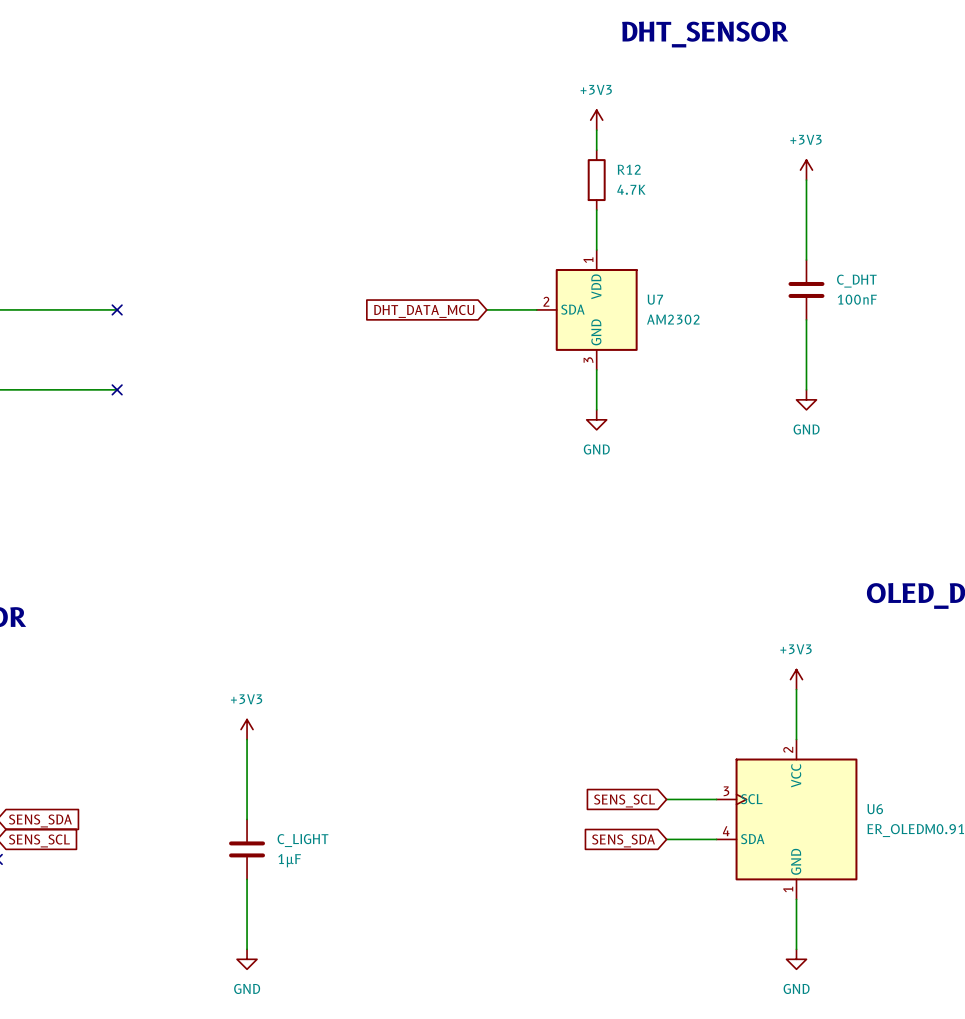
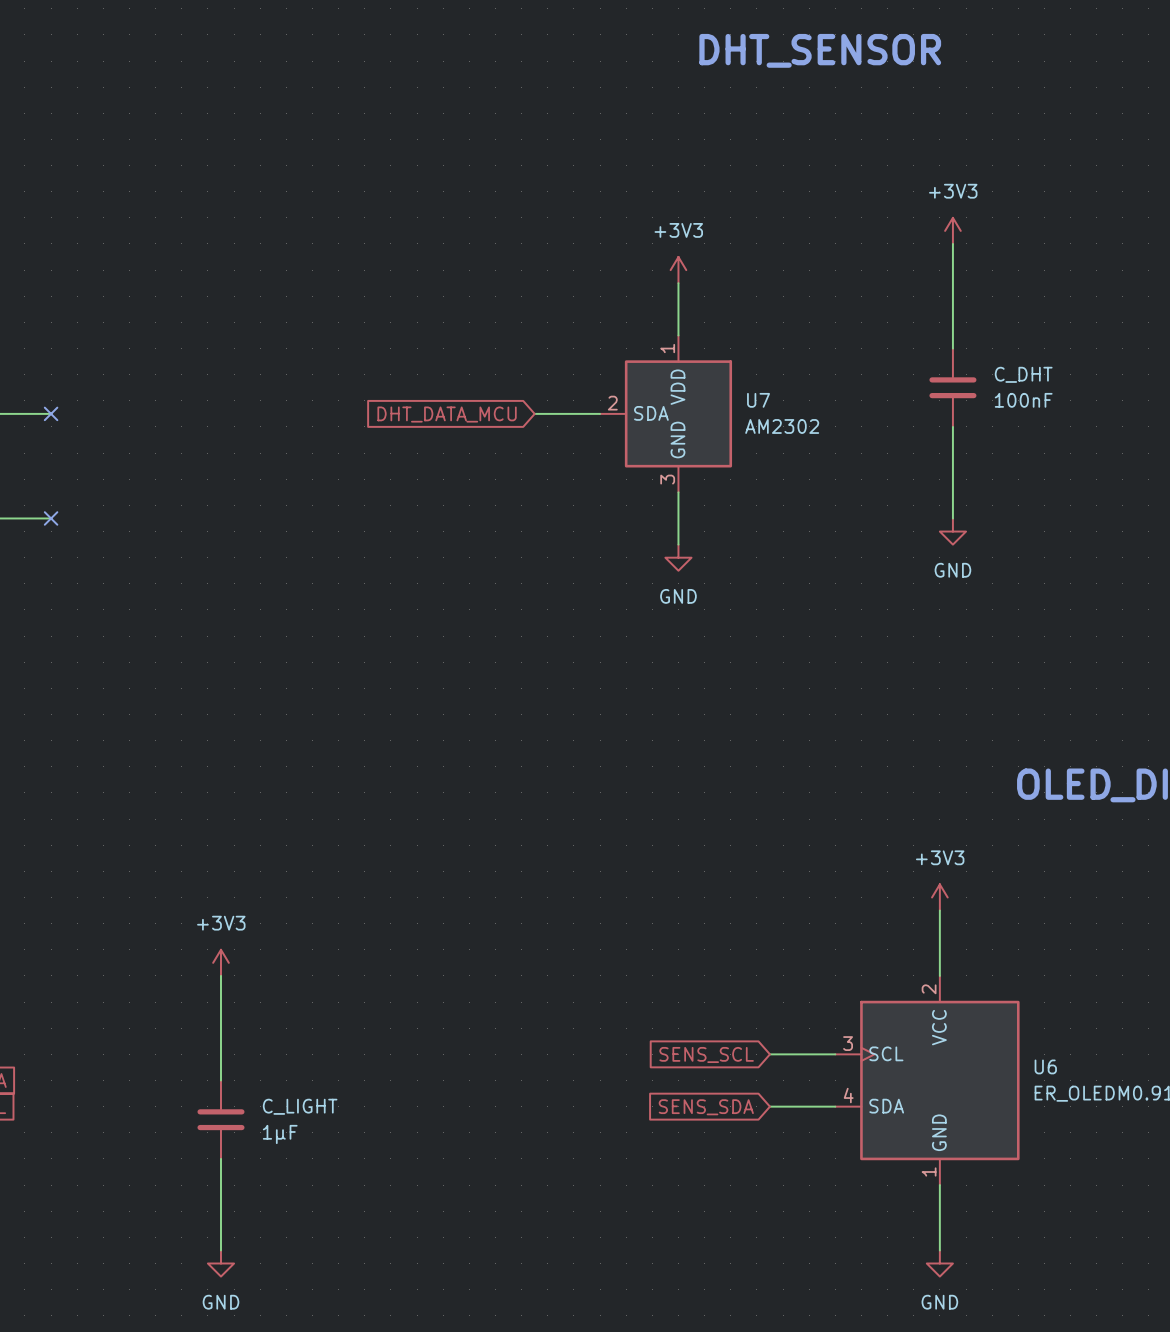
power symbol position: +3V3 (596, 120) -> +3V3 (678, 270)
wire: (596, 130) (596, 150) -> none
R12: 4.7K (596, 180) -> none

